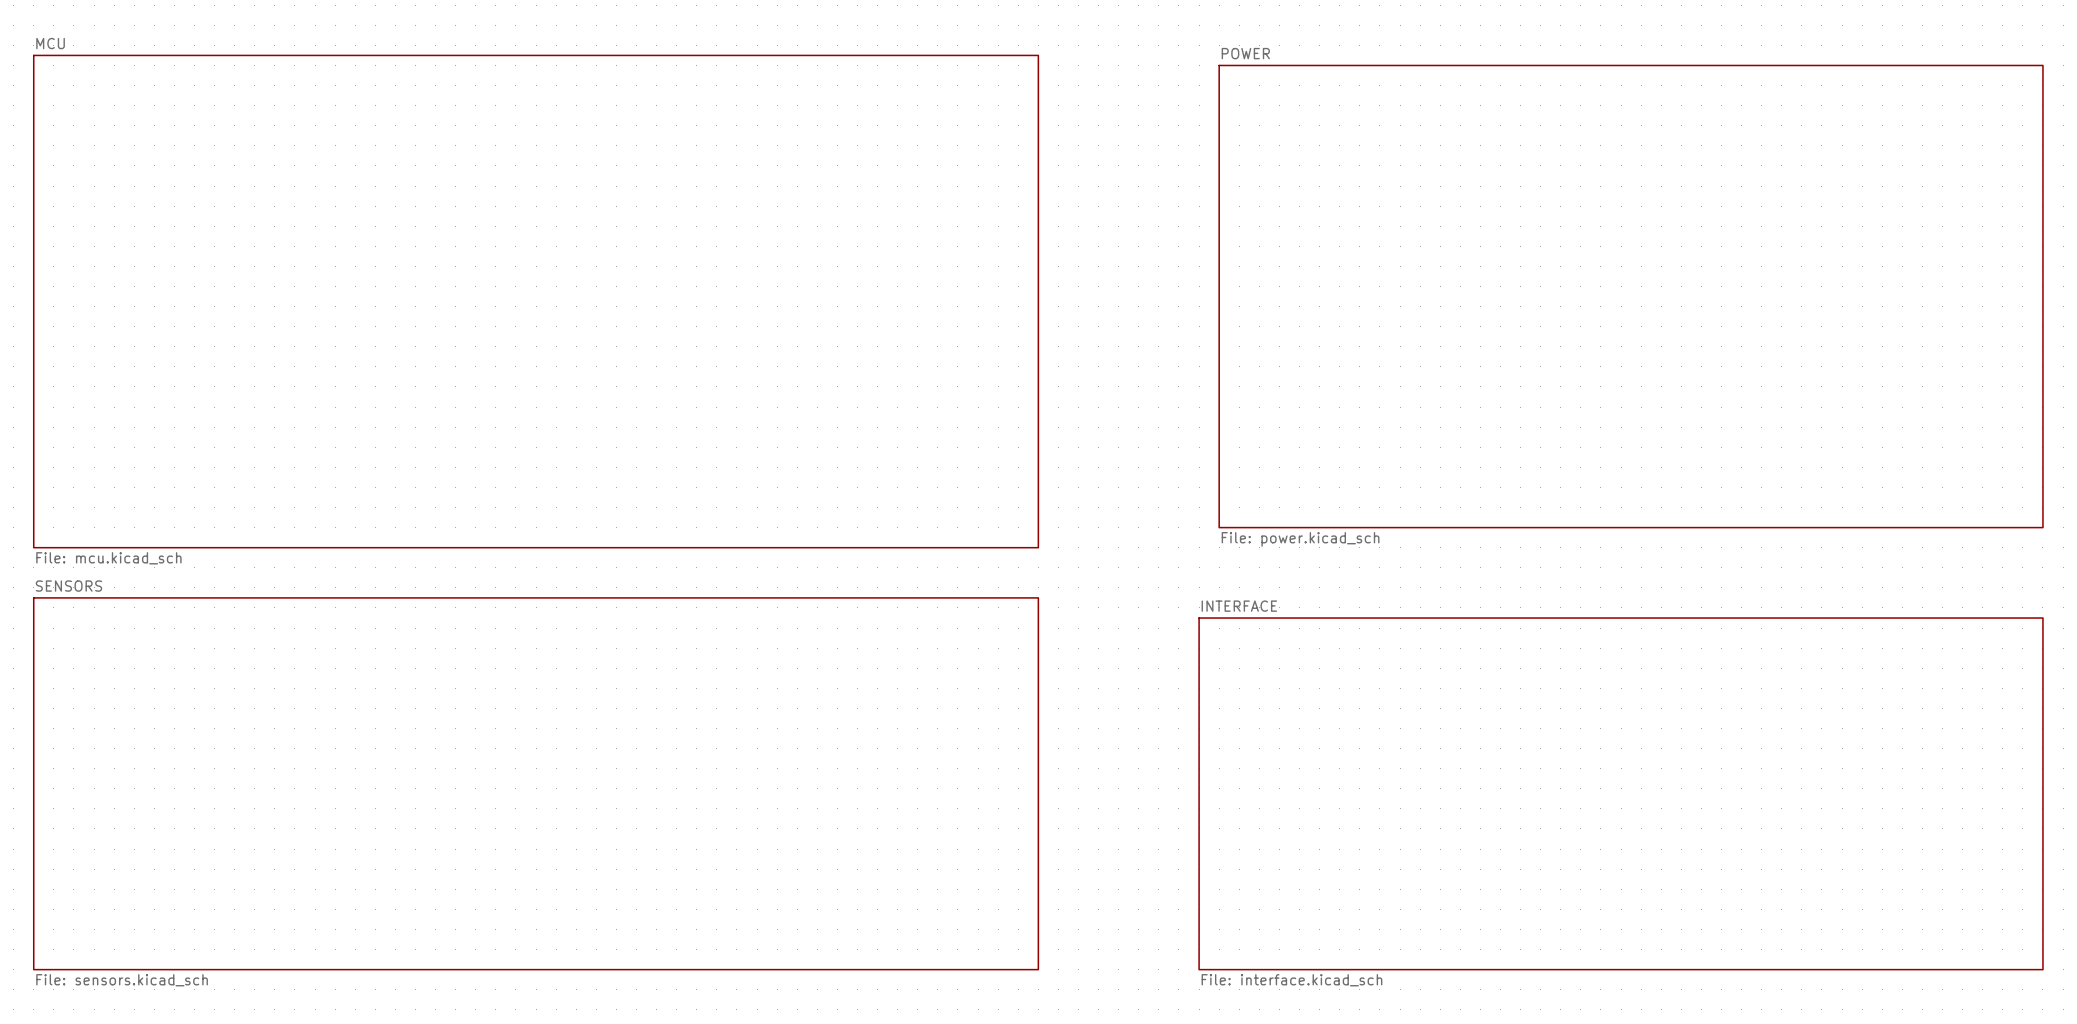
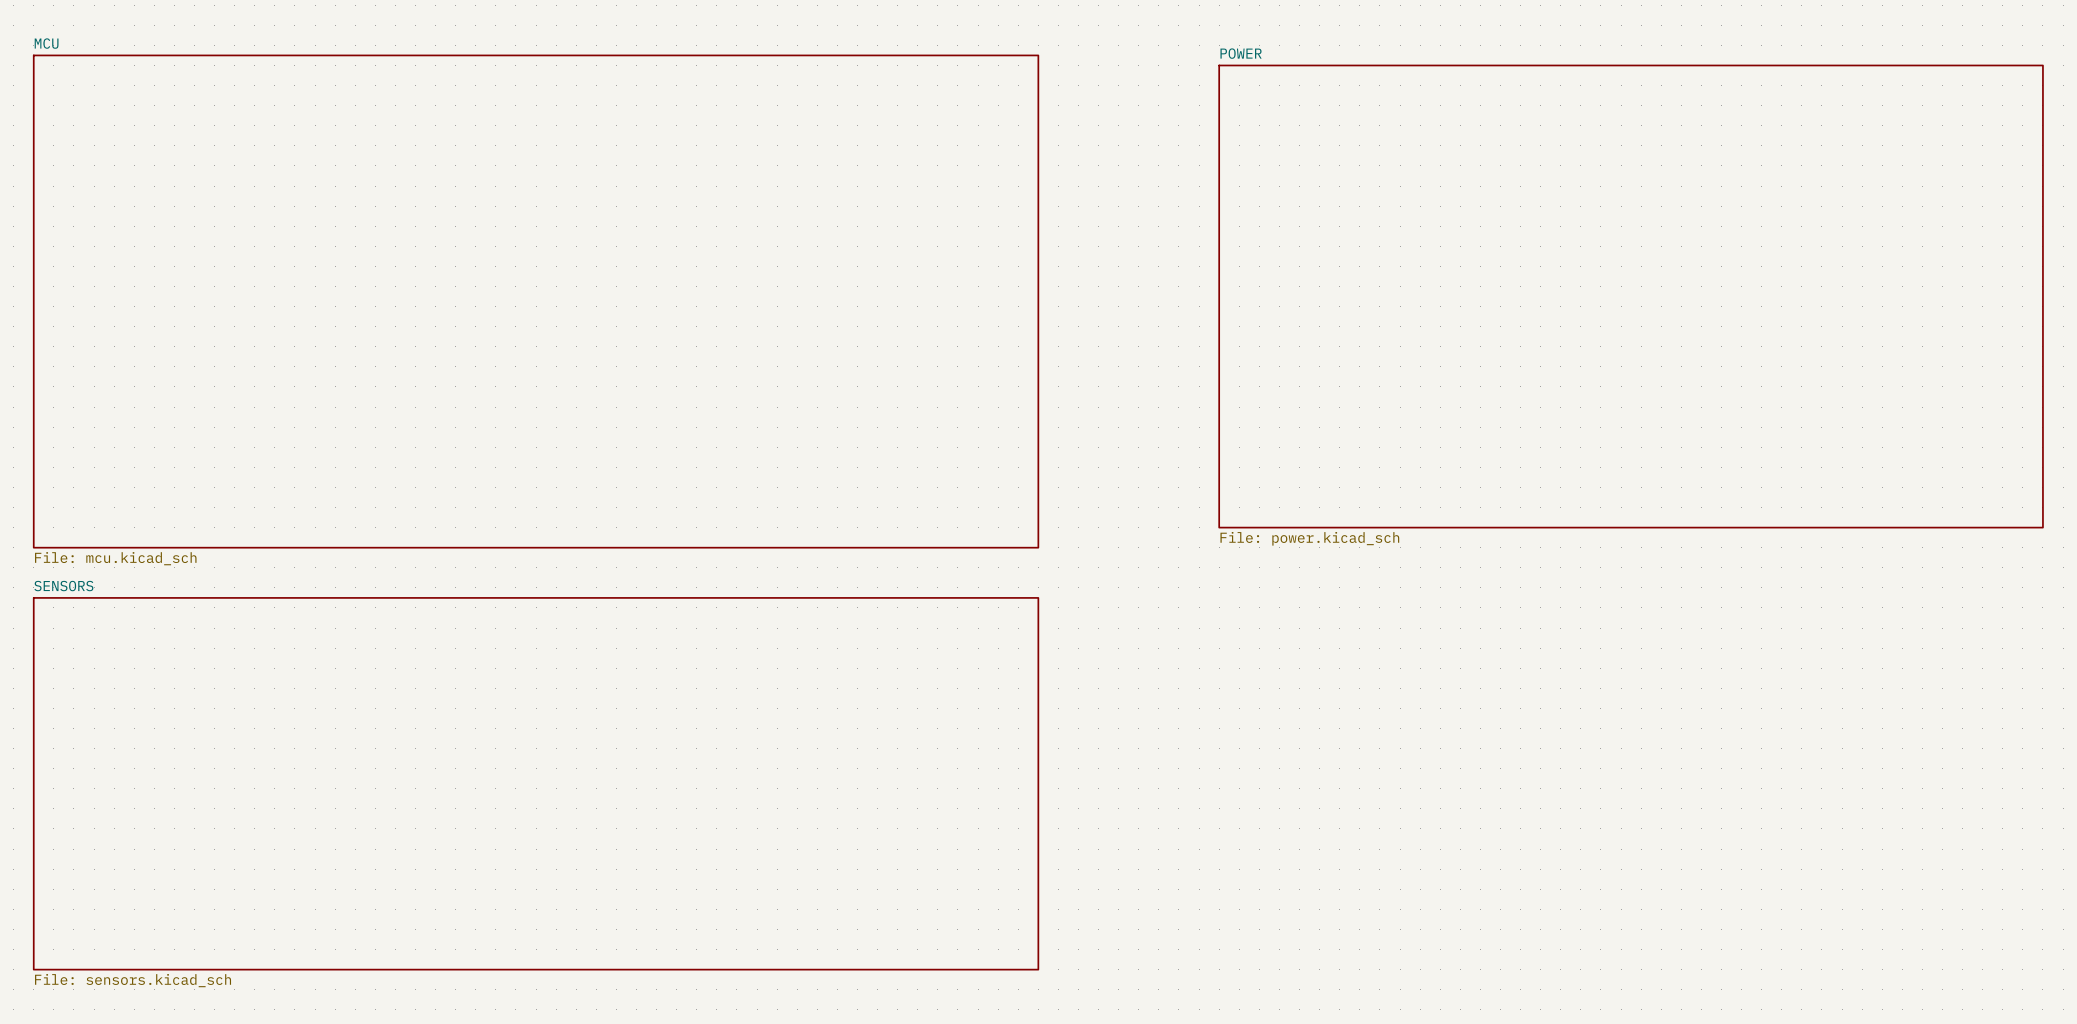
sheet INTERFACE: File: interface.kicad_sch (1621, 793) -> none

